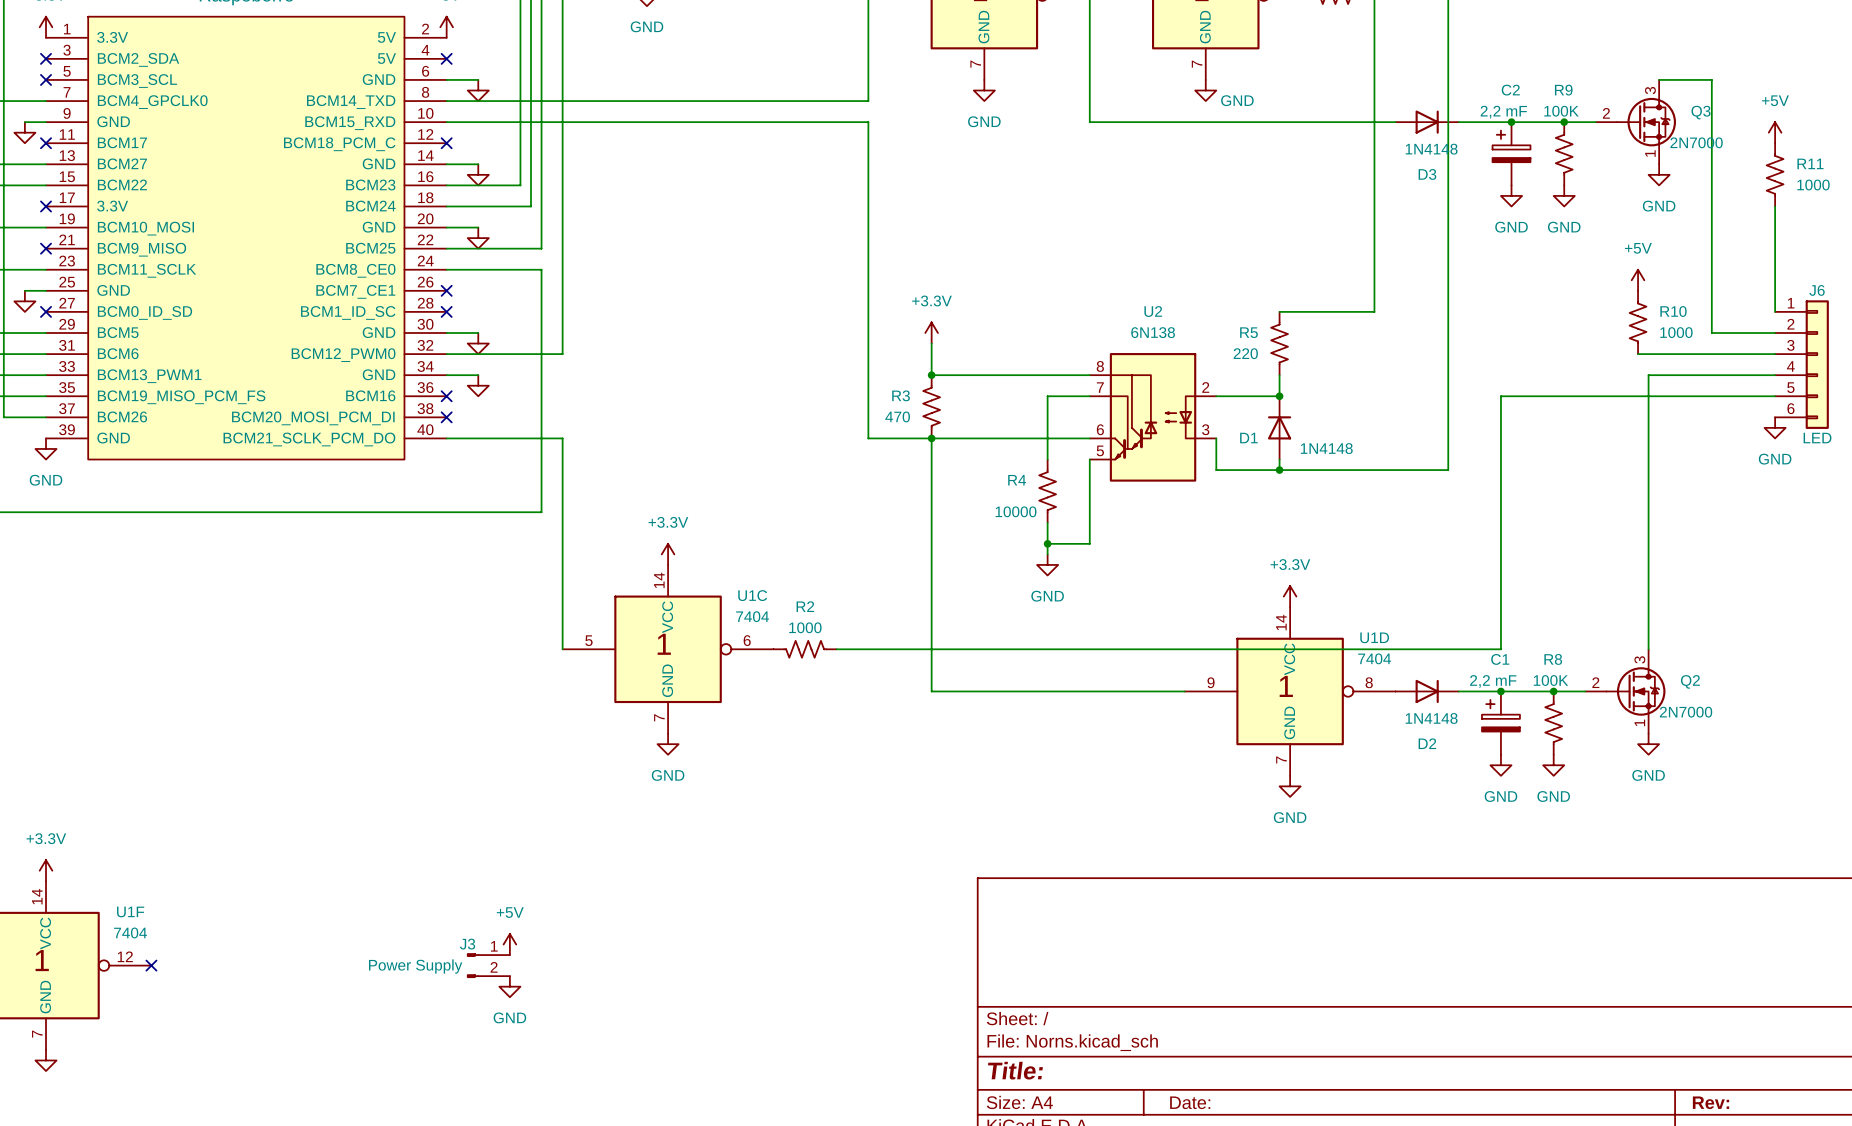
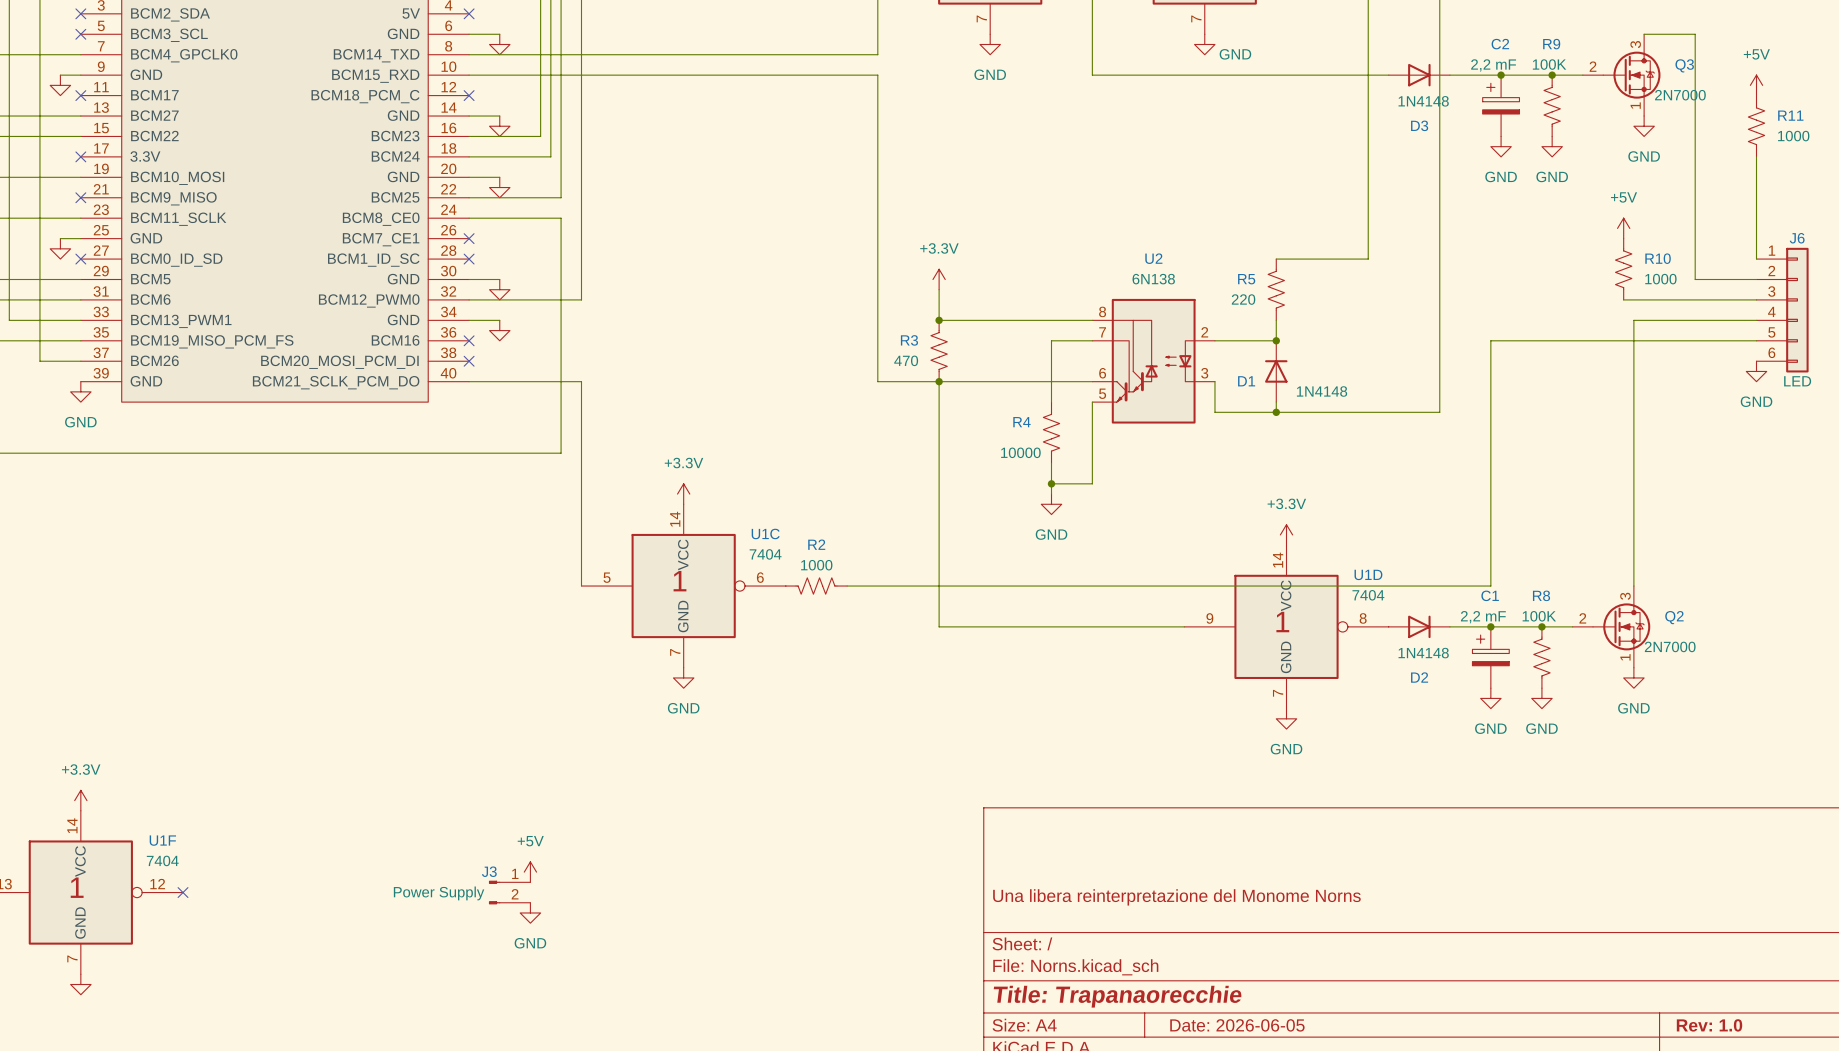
title block: none -> Una libera reinterpretazione del Monome Norns (1176, 897)
title block: Title: (1015, 1070) -> Title: Trapanaorecchie (1117, 996)
title block: Date: (1190, 1102) -> Date: 2026-06-05 (1237, 1025)
title block: Rev: (1711, 1102) -> Rev: 1.0 (1709, 1025)

